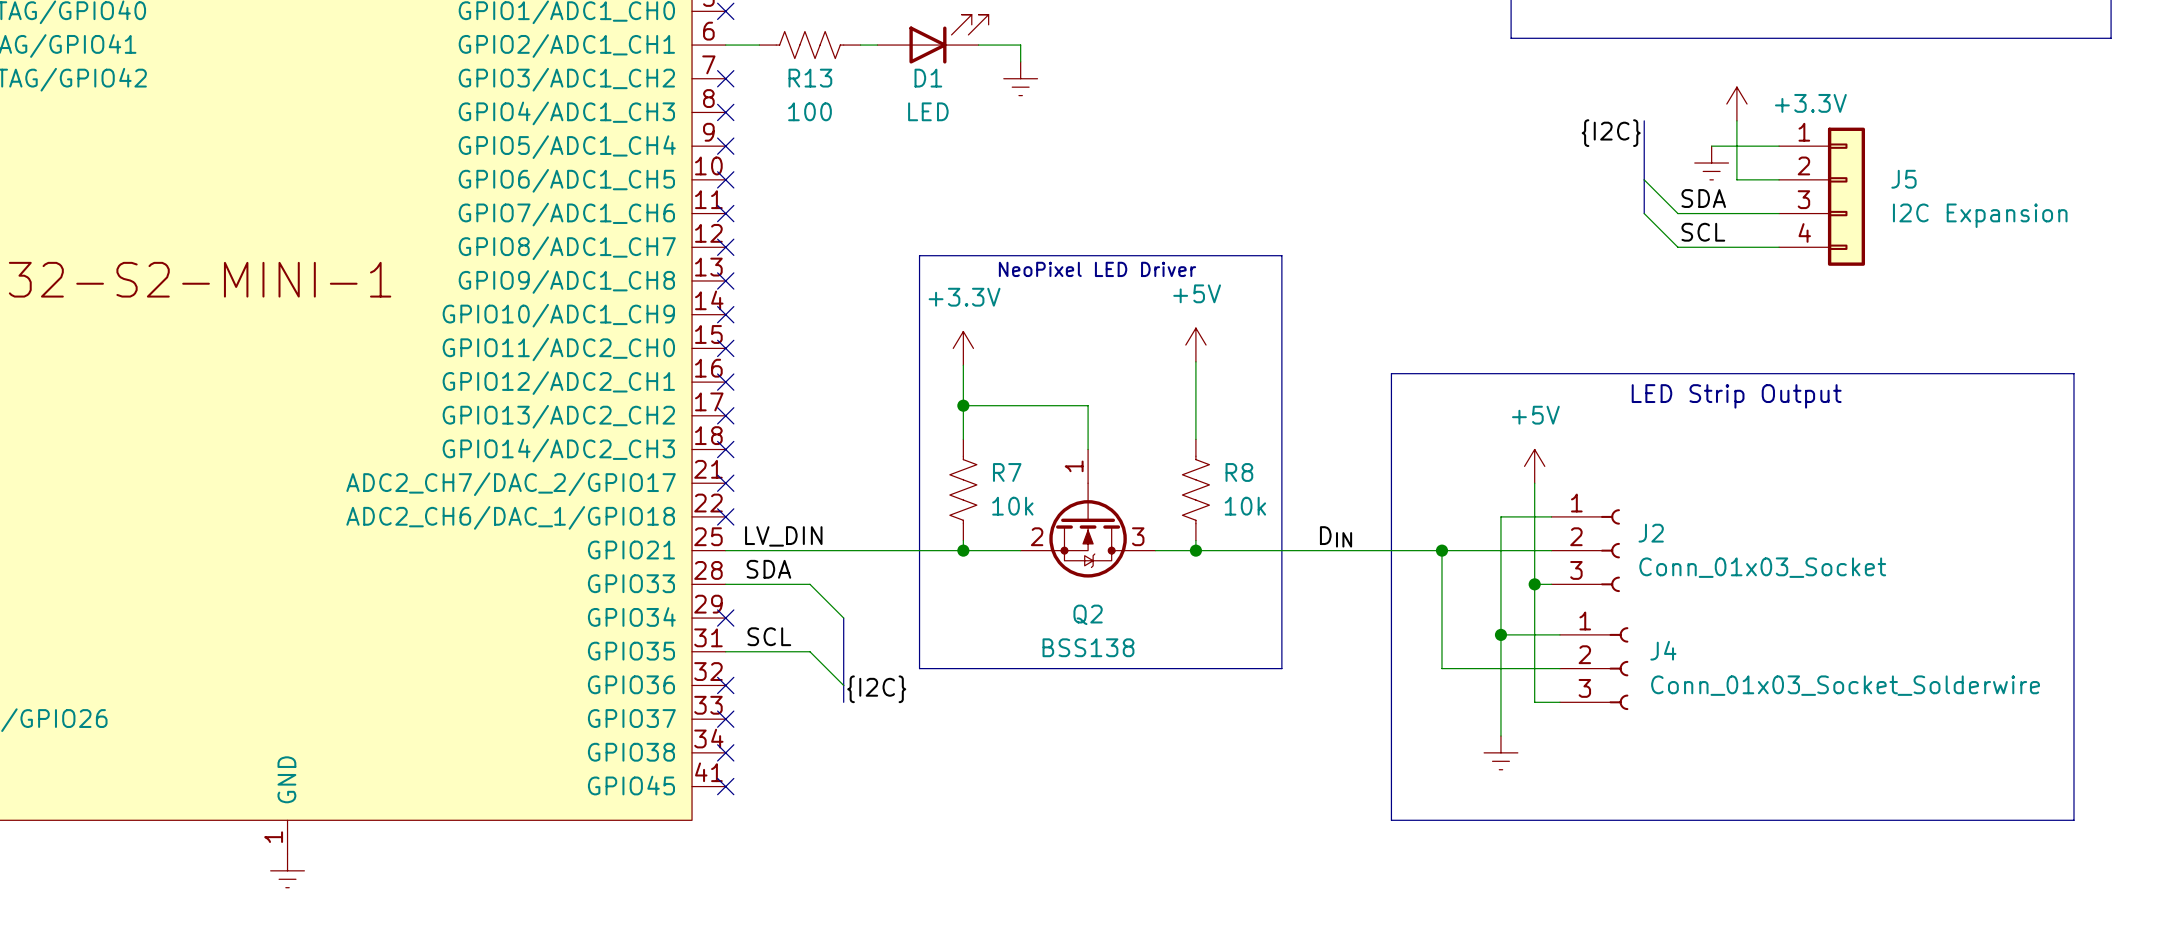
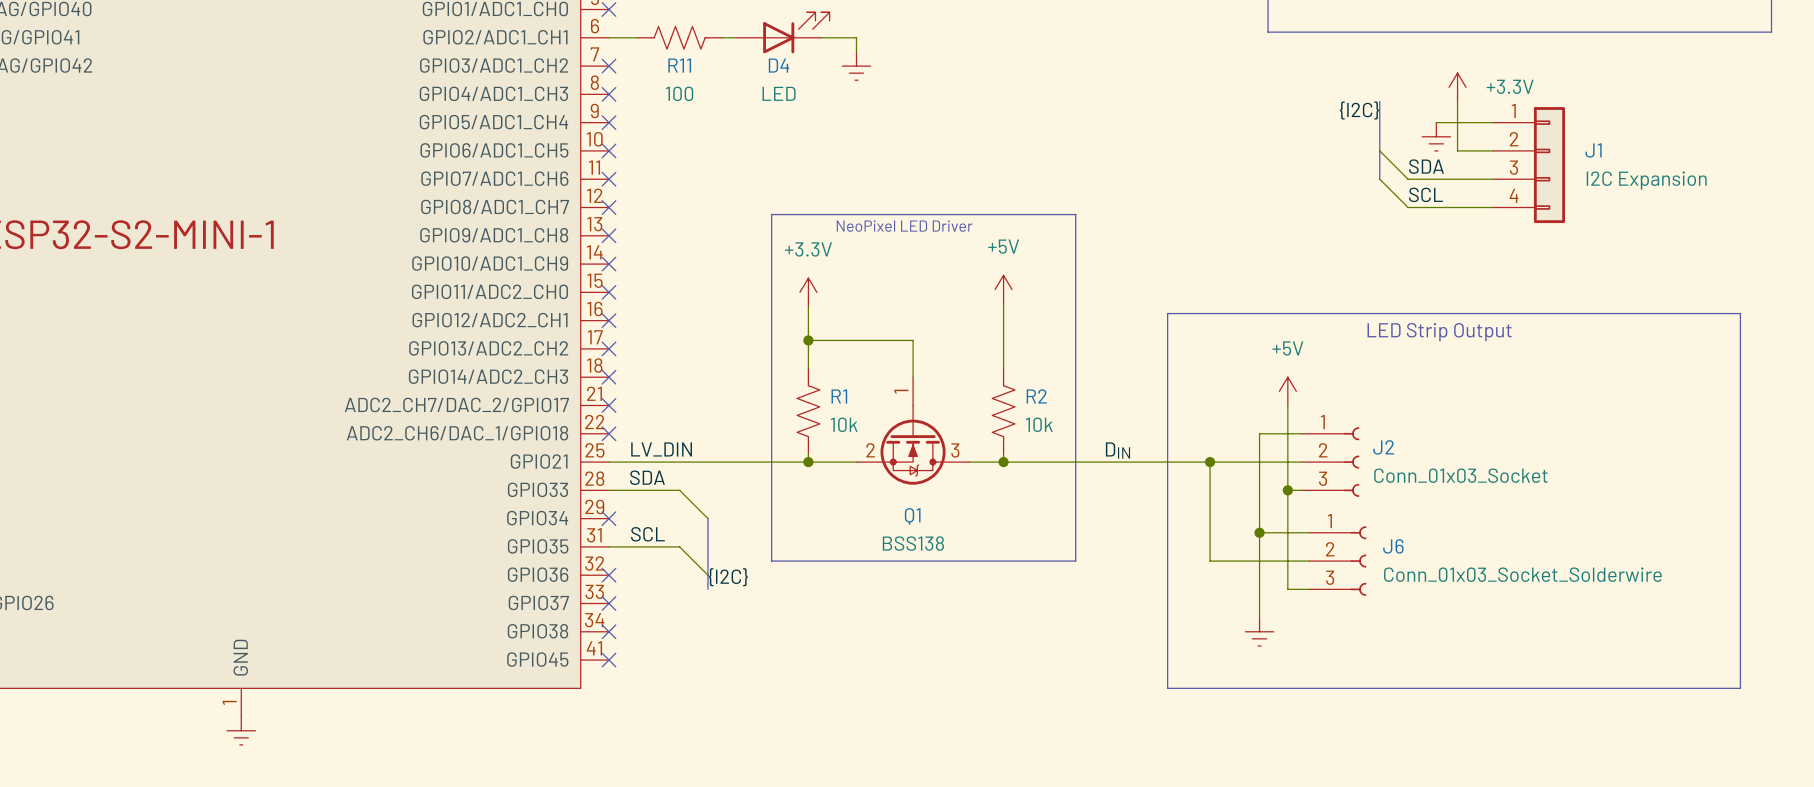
R13 name: R13 (810, 78) -> R11 (679, 65)
D1 name: D1 (928, 78) -> D4 (779, 65)
J5 name: J5 (1903, 179) -> J1 (1593, 150)
R7 name: R7 (1007, 472) -> R1 (839, 396)
R8 name: R8 (1239, 472) -> R2 (1036, 396)
Q2 name: Q2 (1088, 614) -> Q1 (912, 516)
J4 name: J4 (1663, 650) -> J6 (1393, 546)

